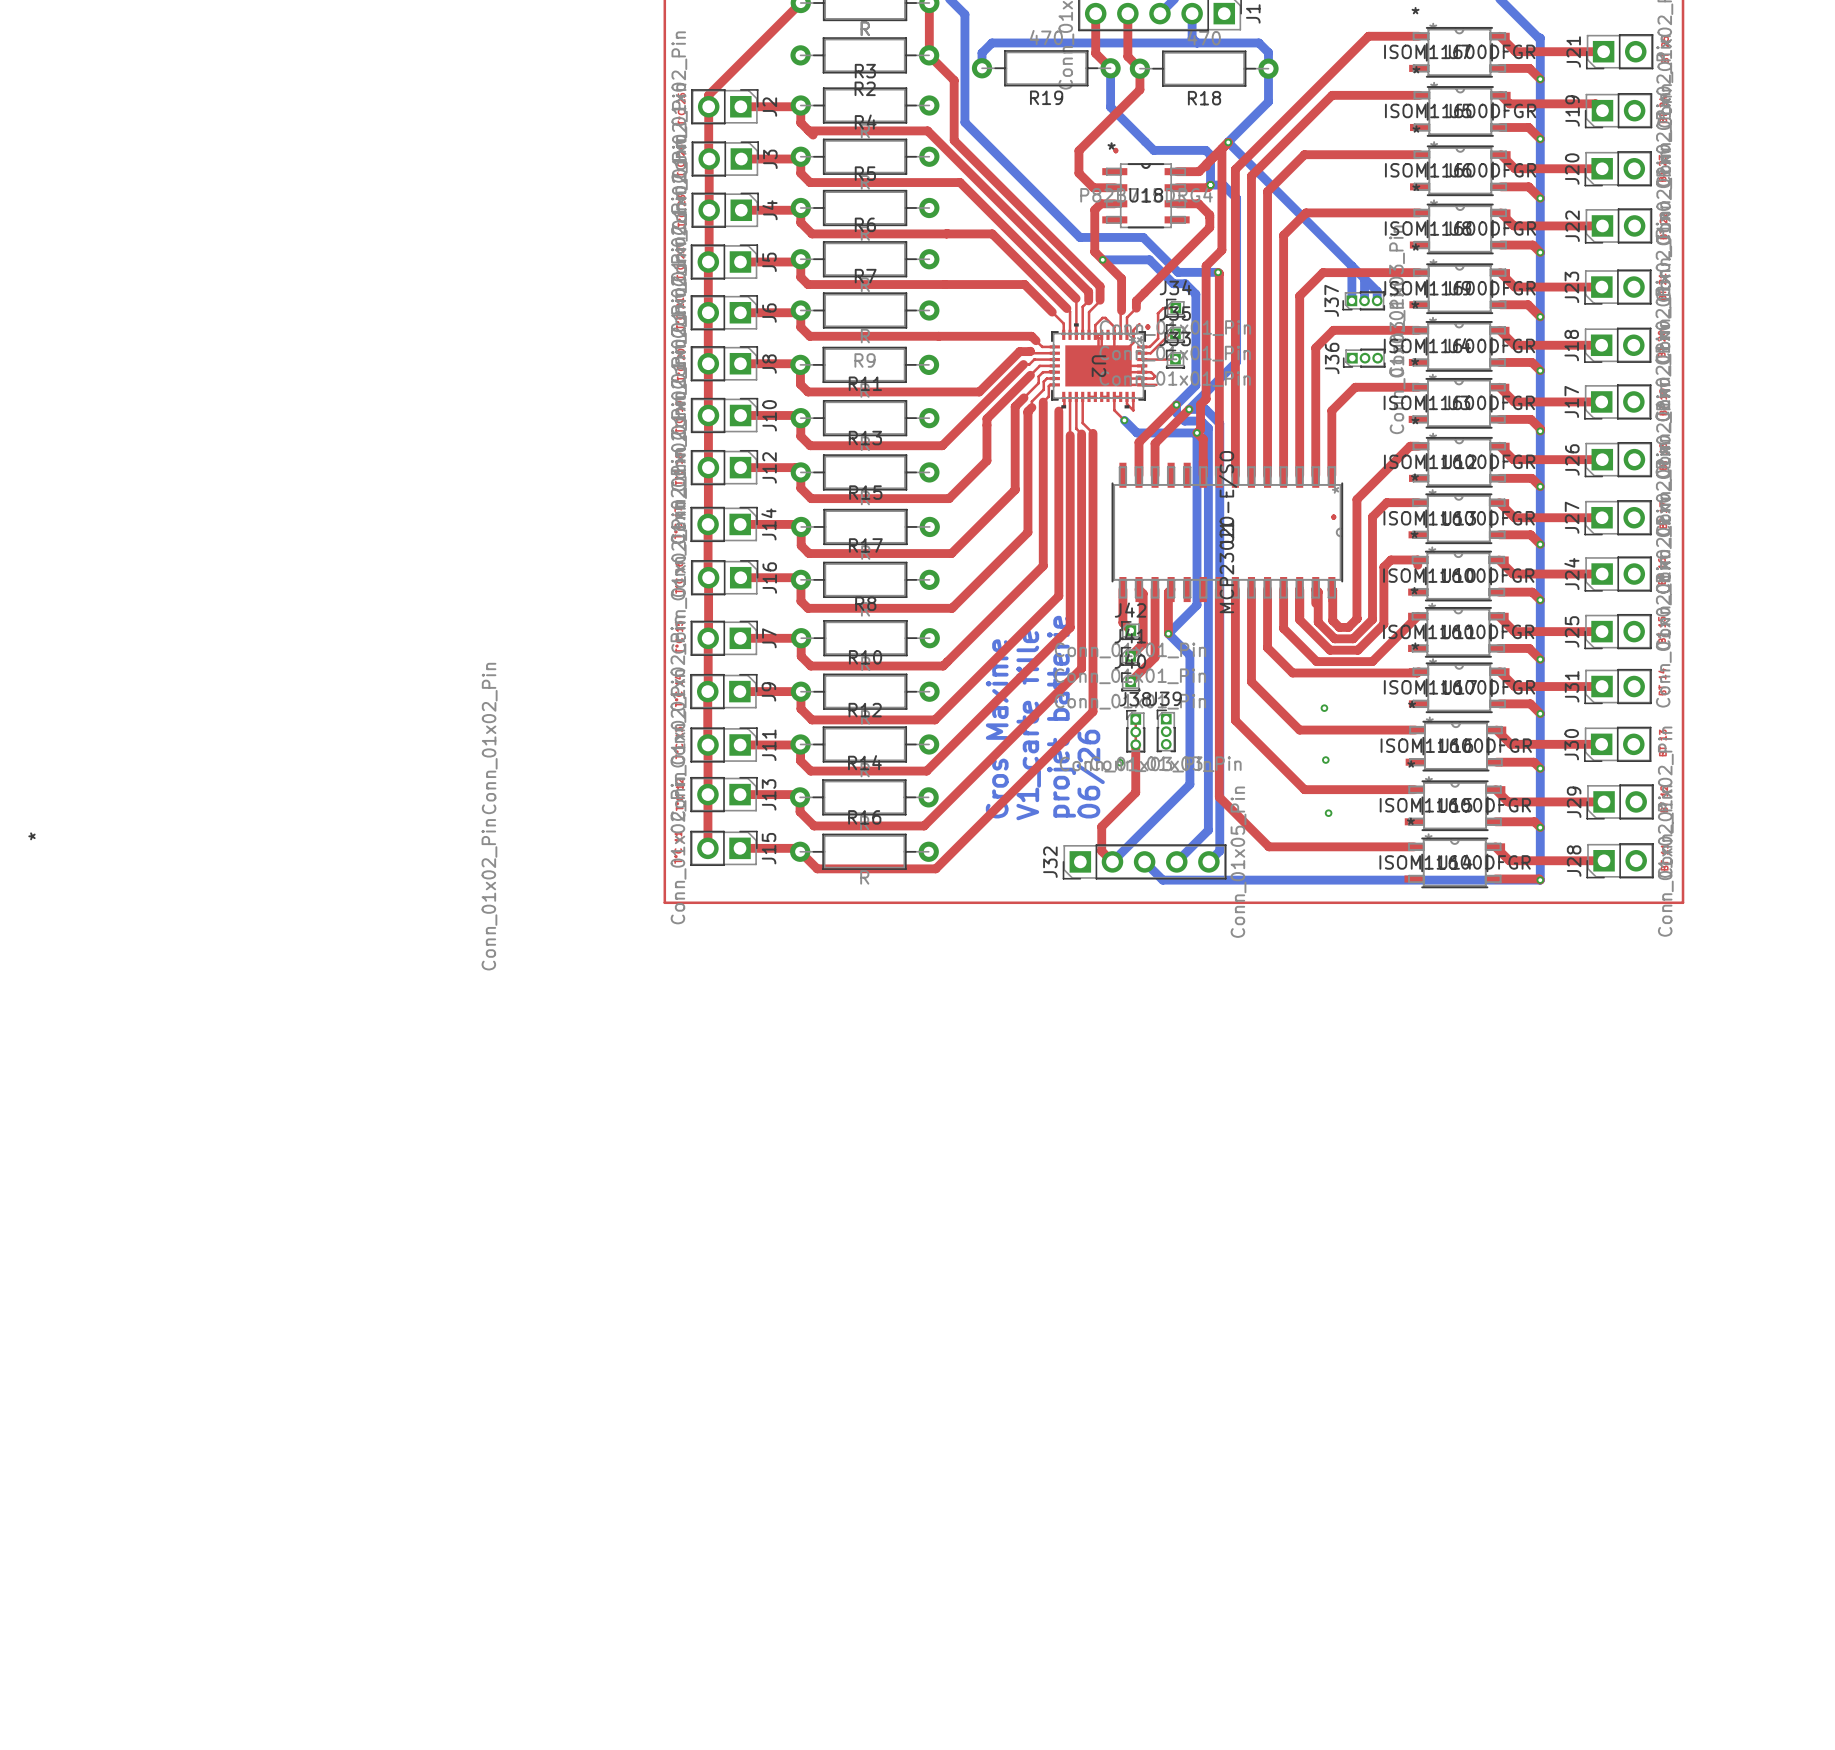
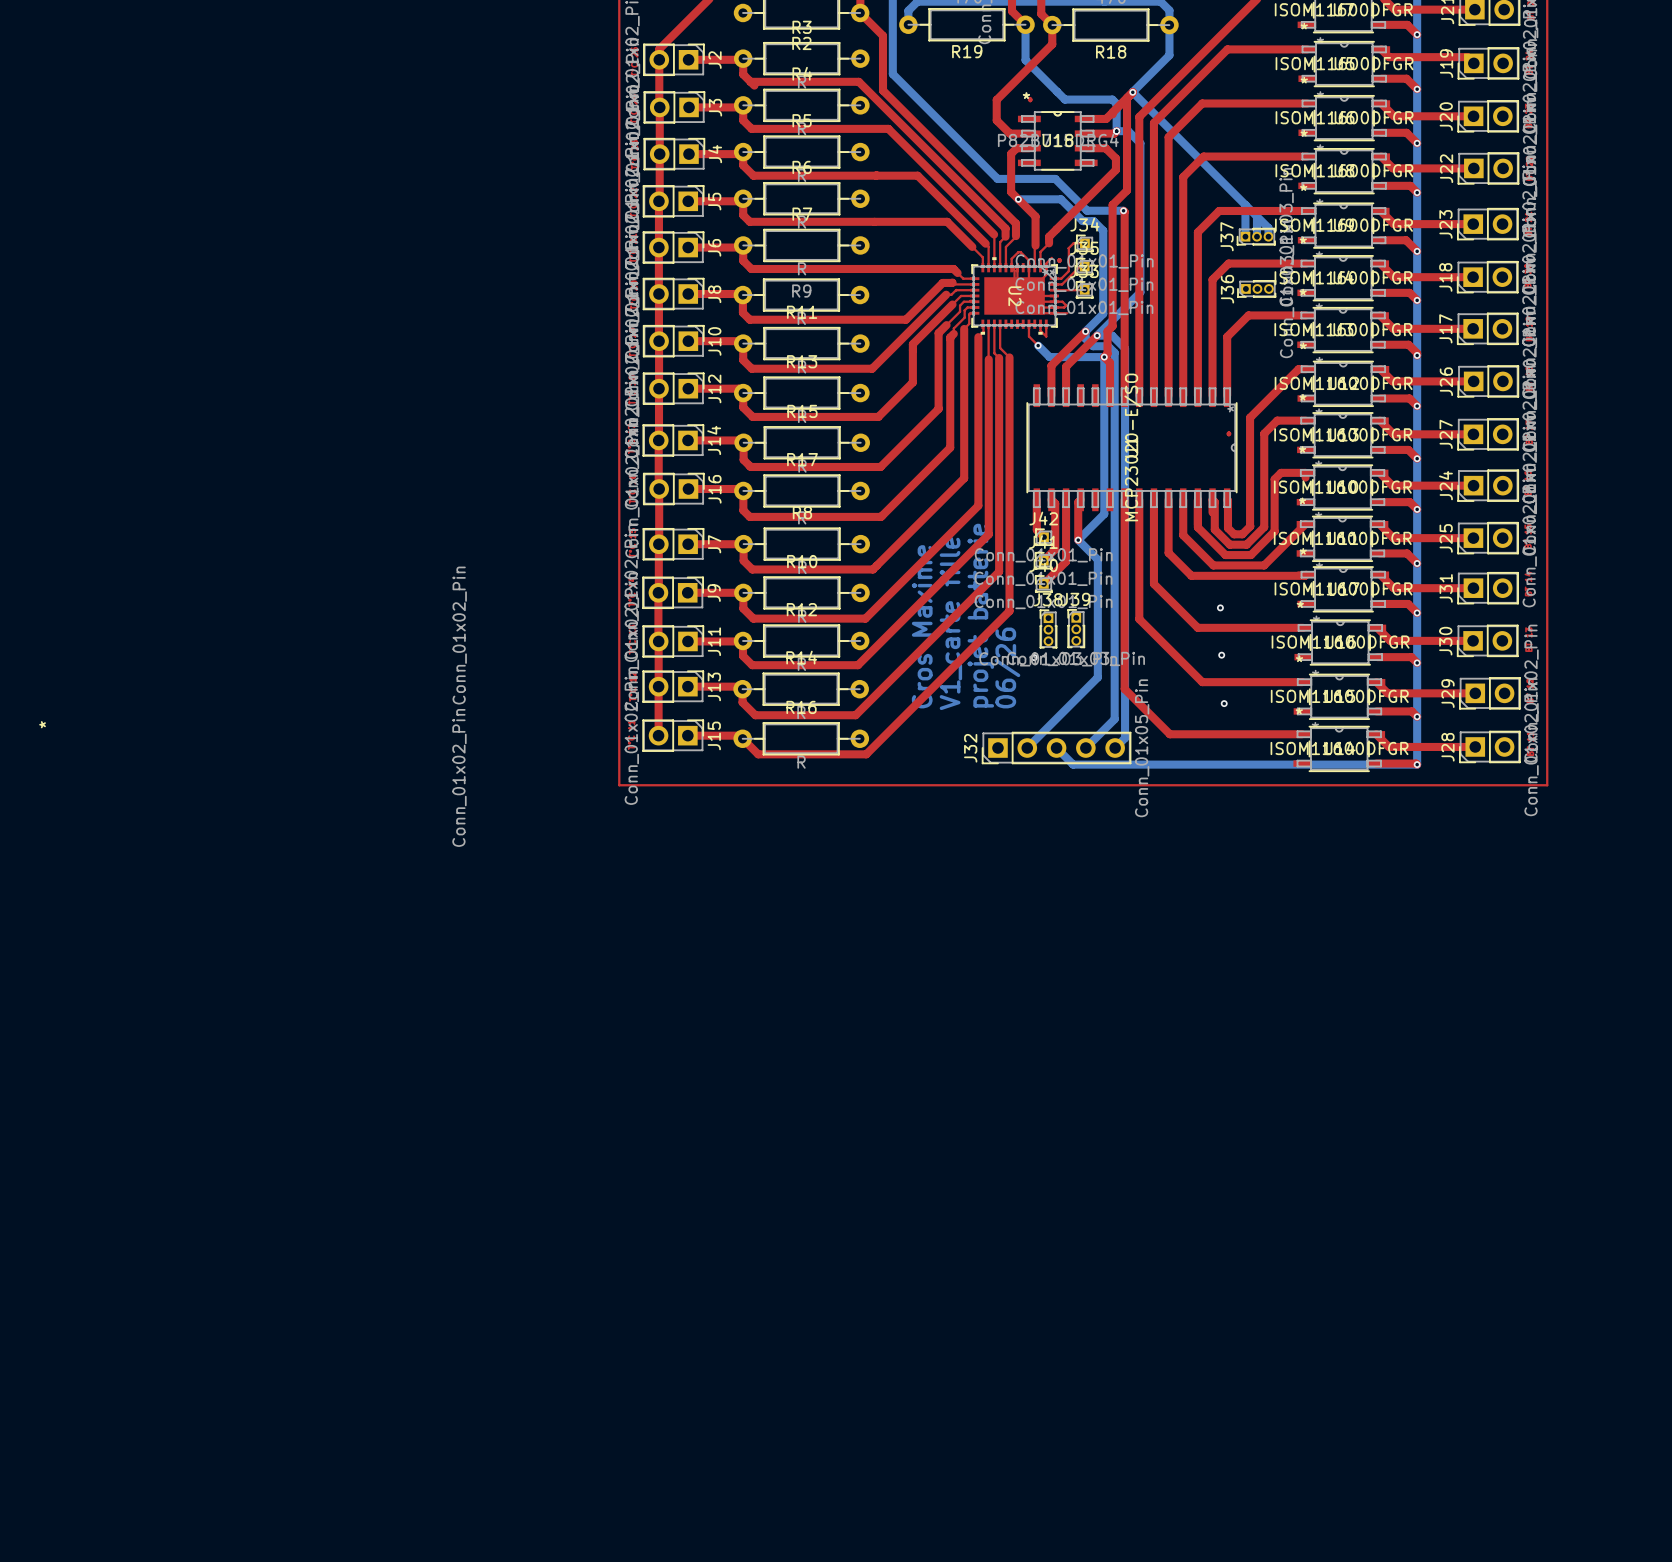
top track: (1135, 719) (1135, 792) (1101, 826) (1101, 851) (1112, 861) -> none

